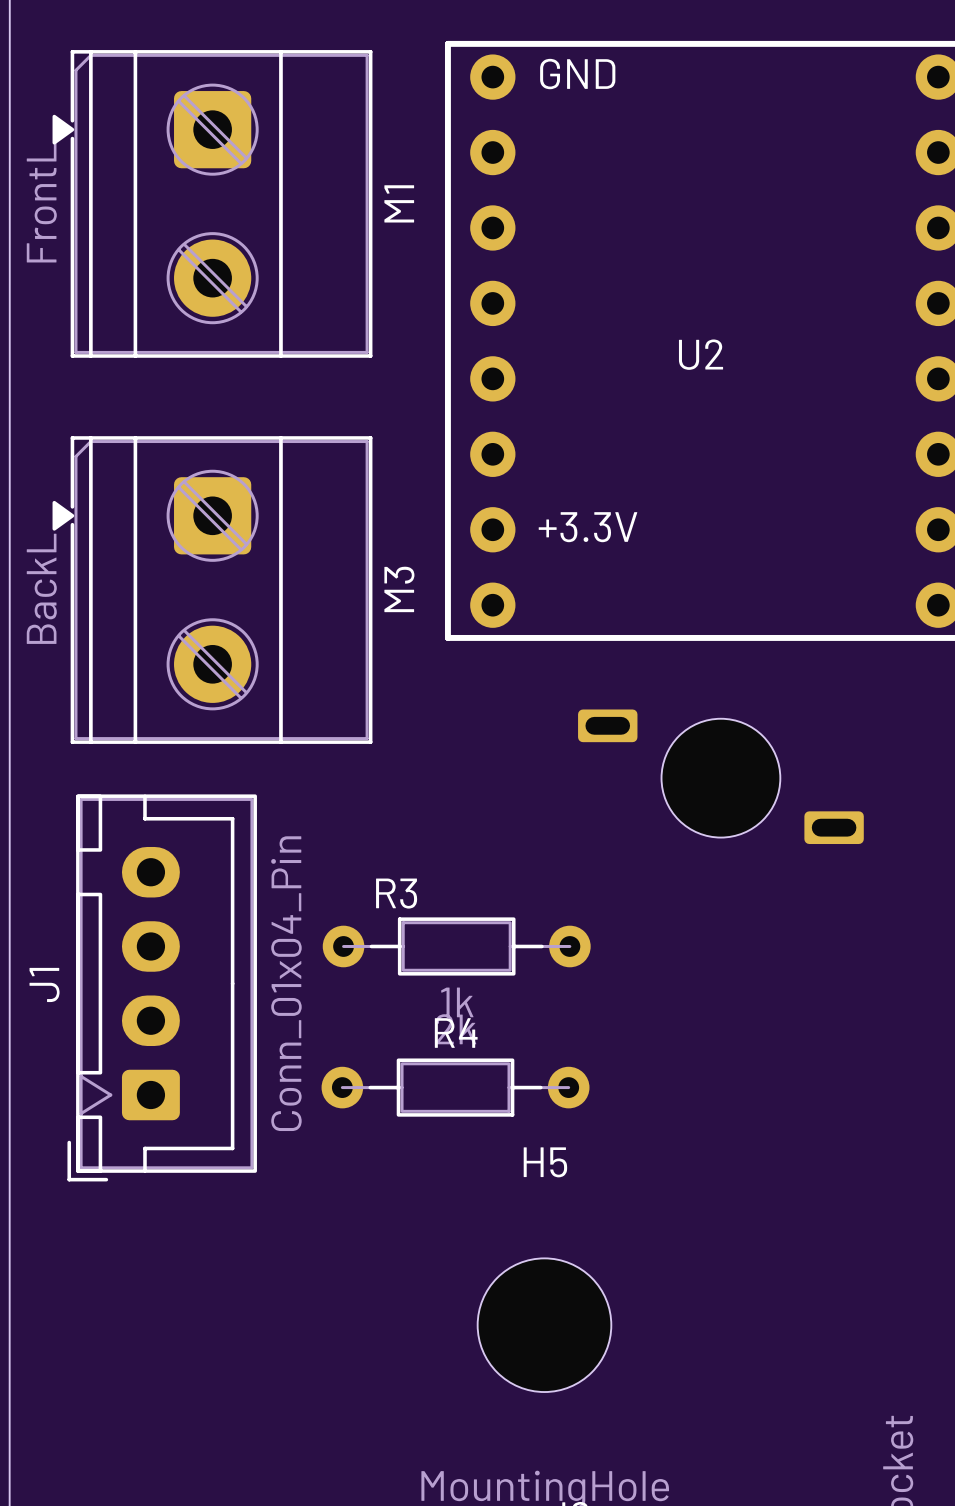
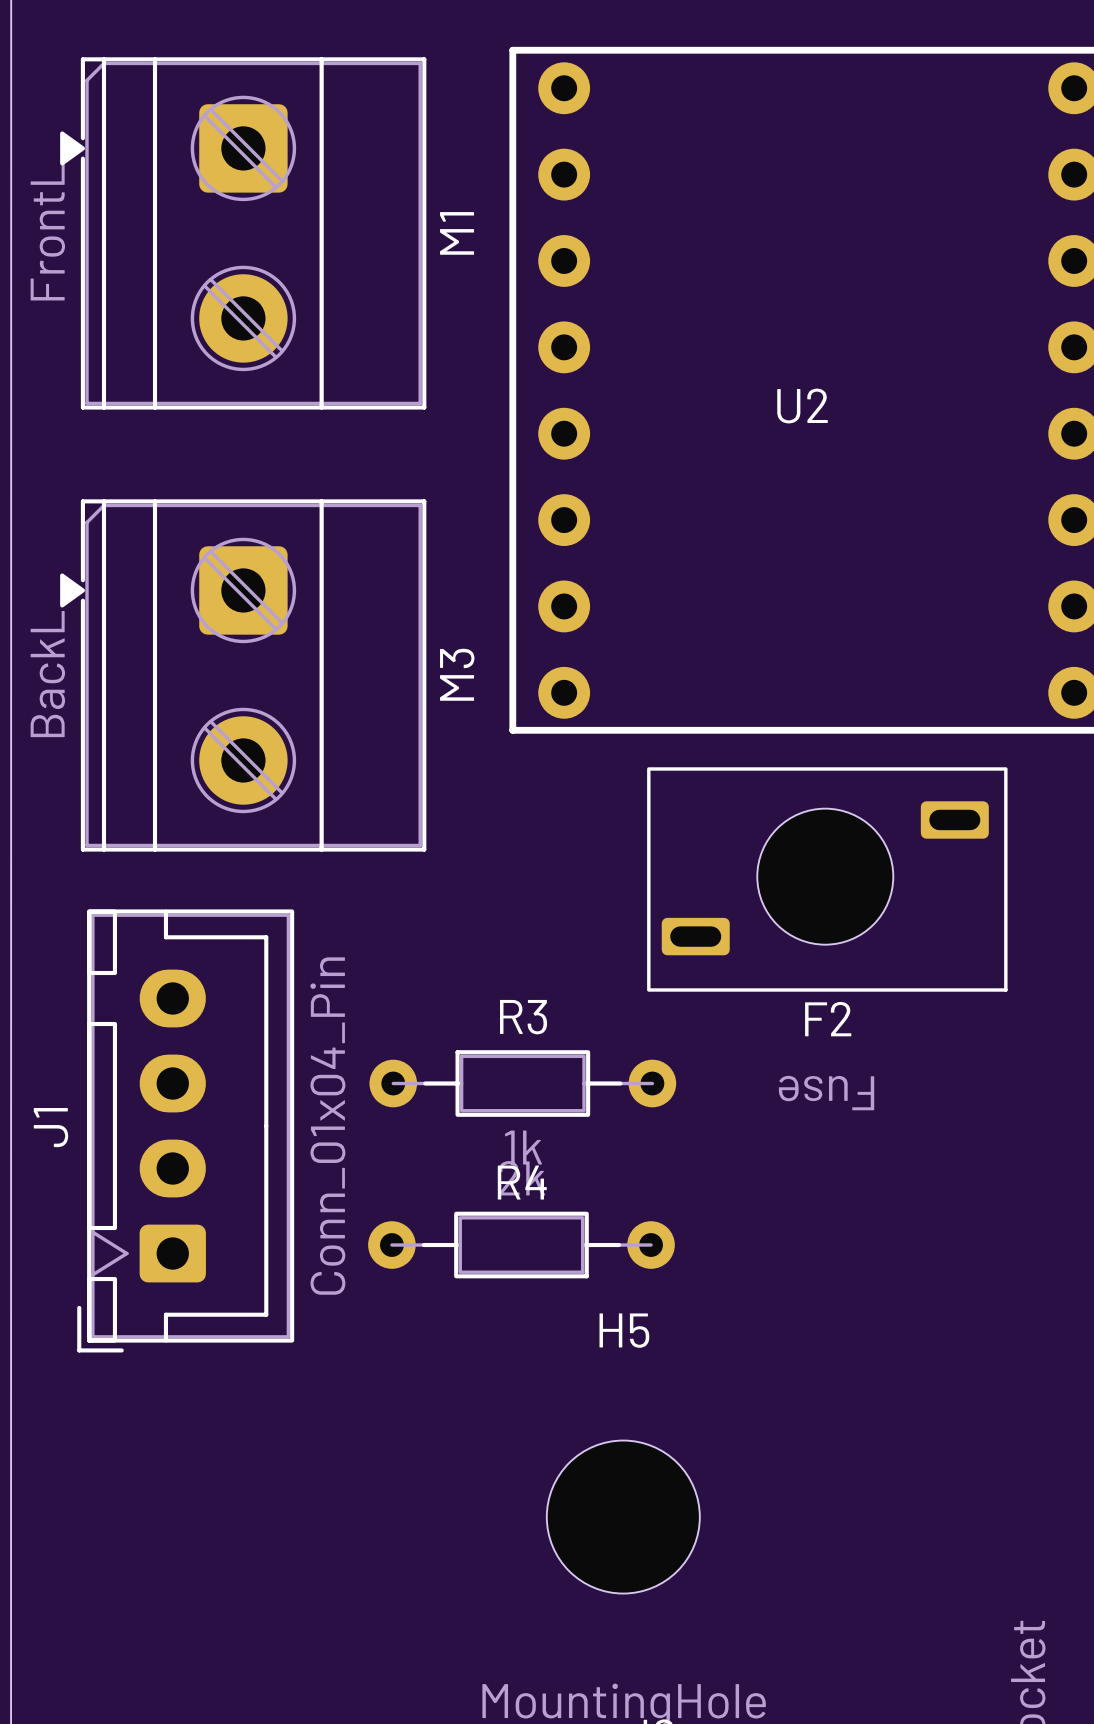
text: GND (577, 74) -> none
text: +3.3V (588, 527) -> none
F2 side: bottom (720, 776) -> top (827, 879)
R3 name position: R3 (396, 893) -> R3 (523, 1017)

